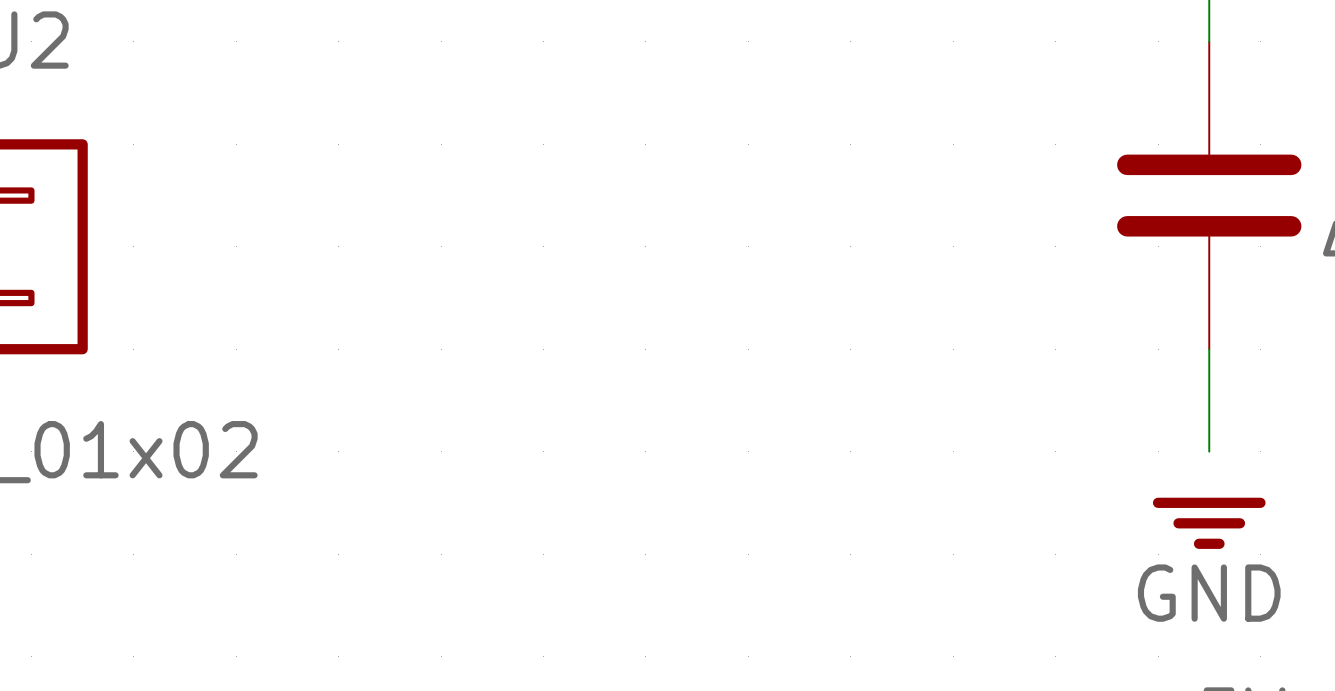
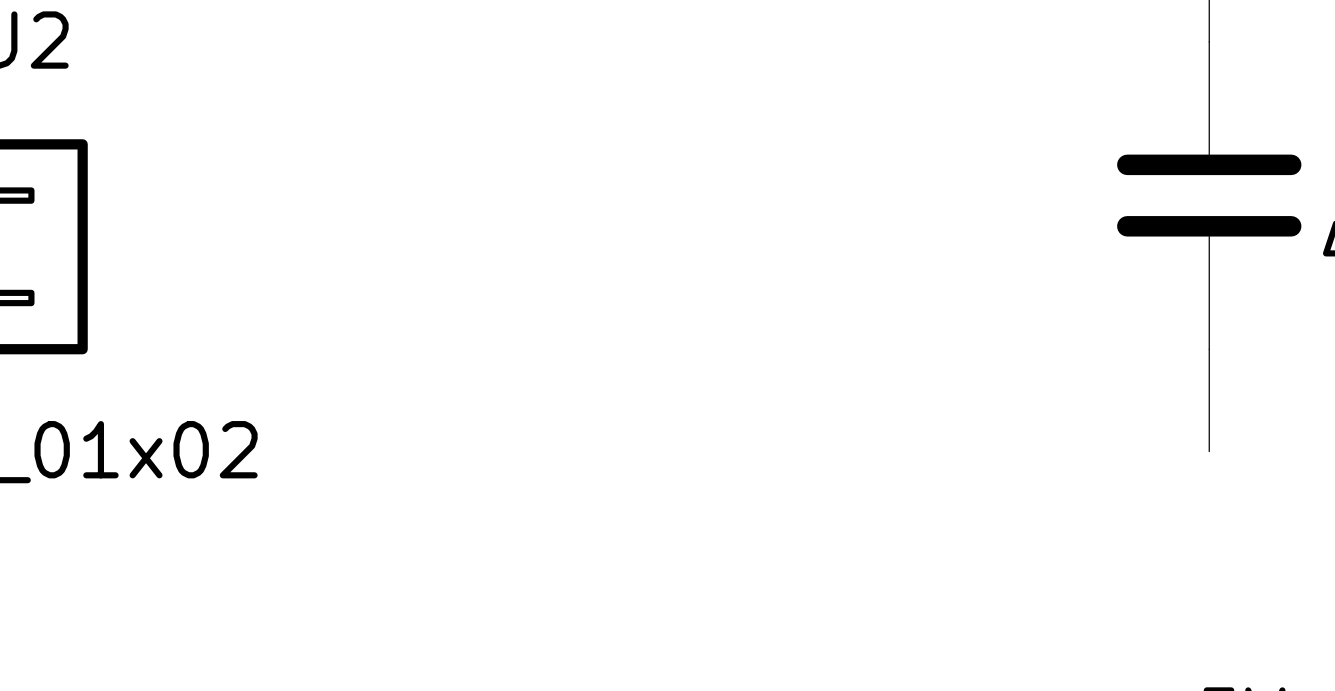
power symbol: GND (1209, 523) -> none

